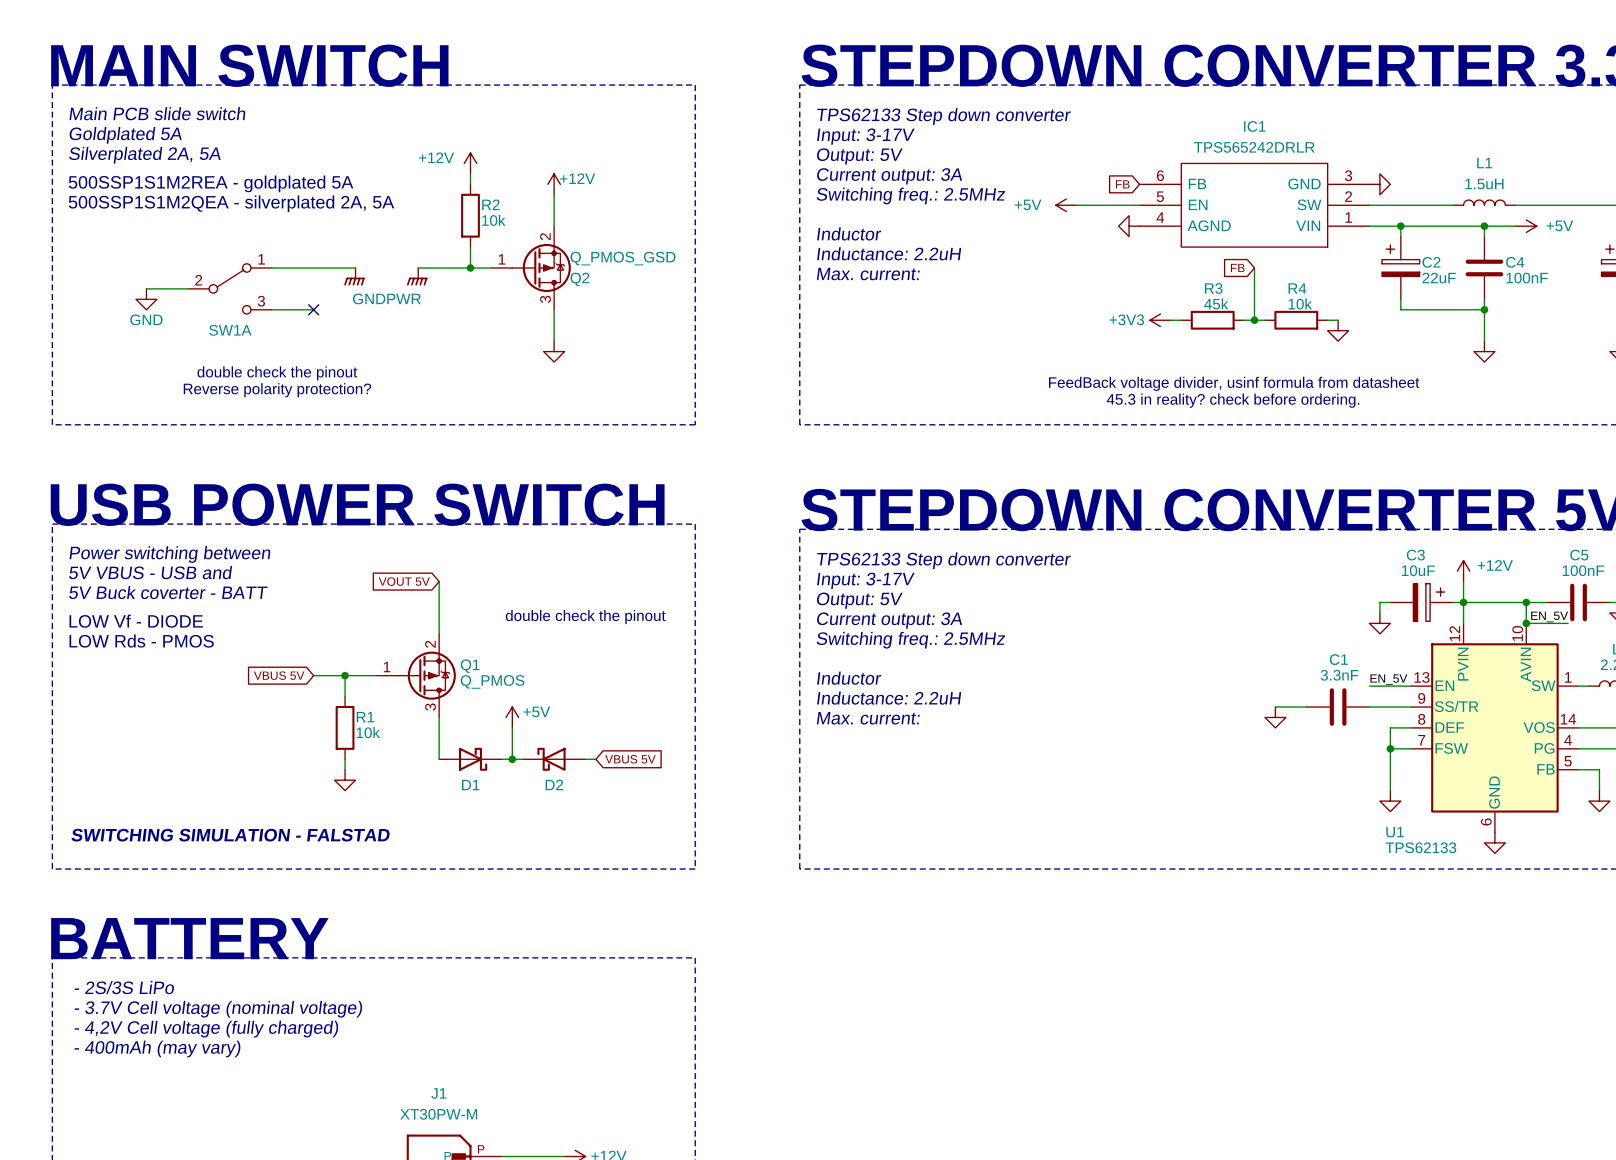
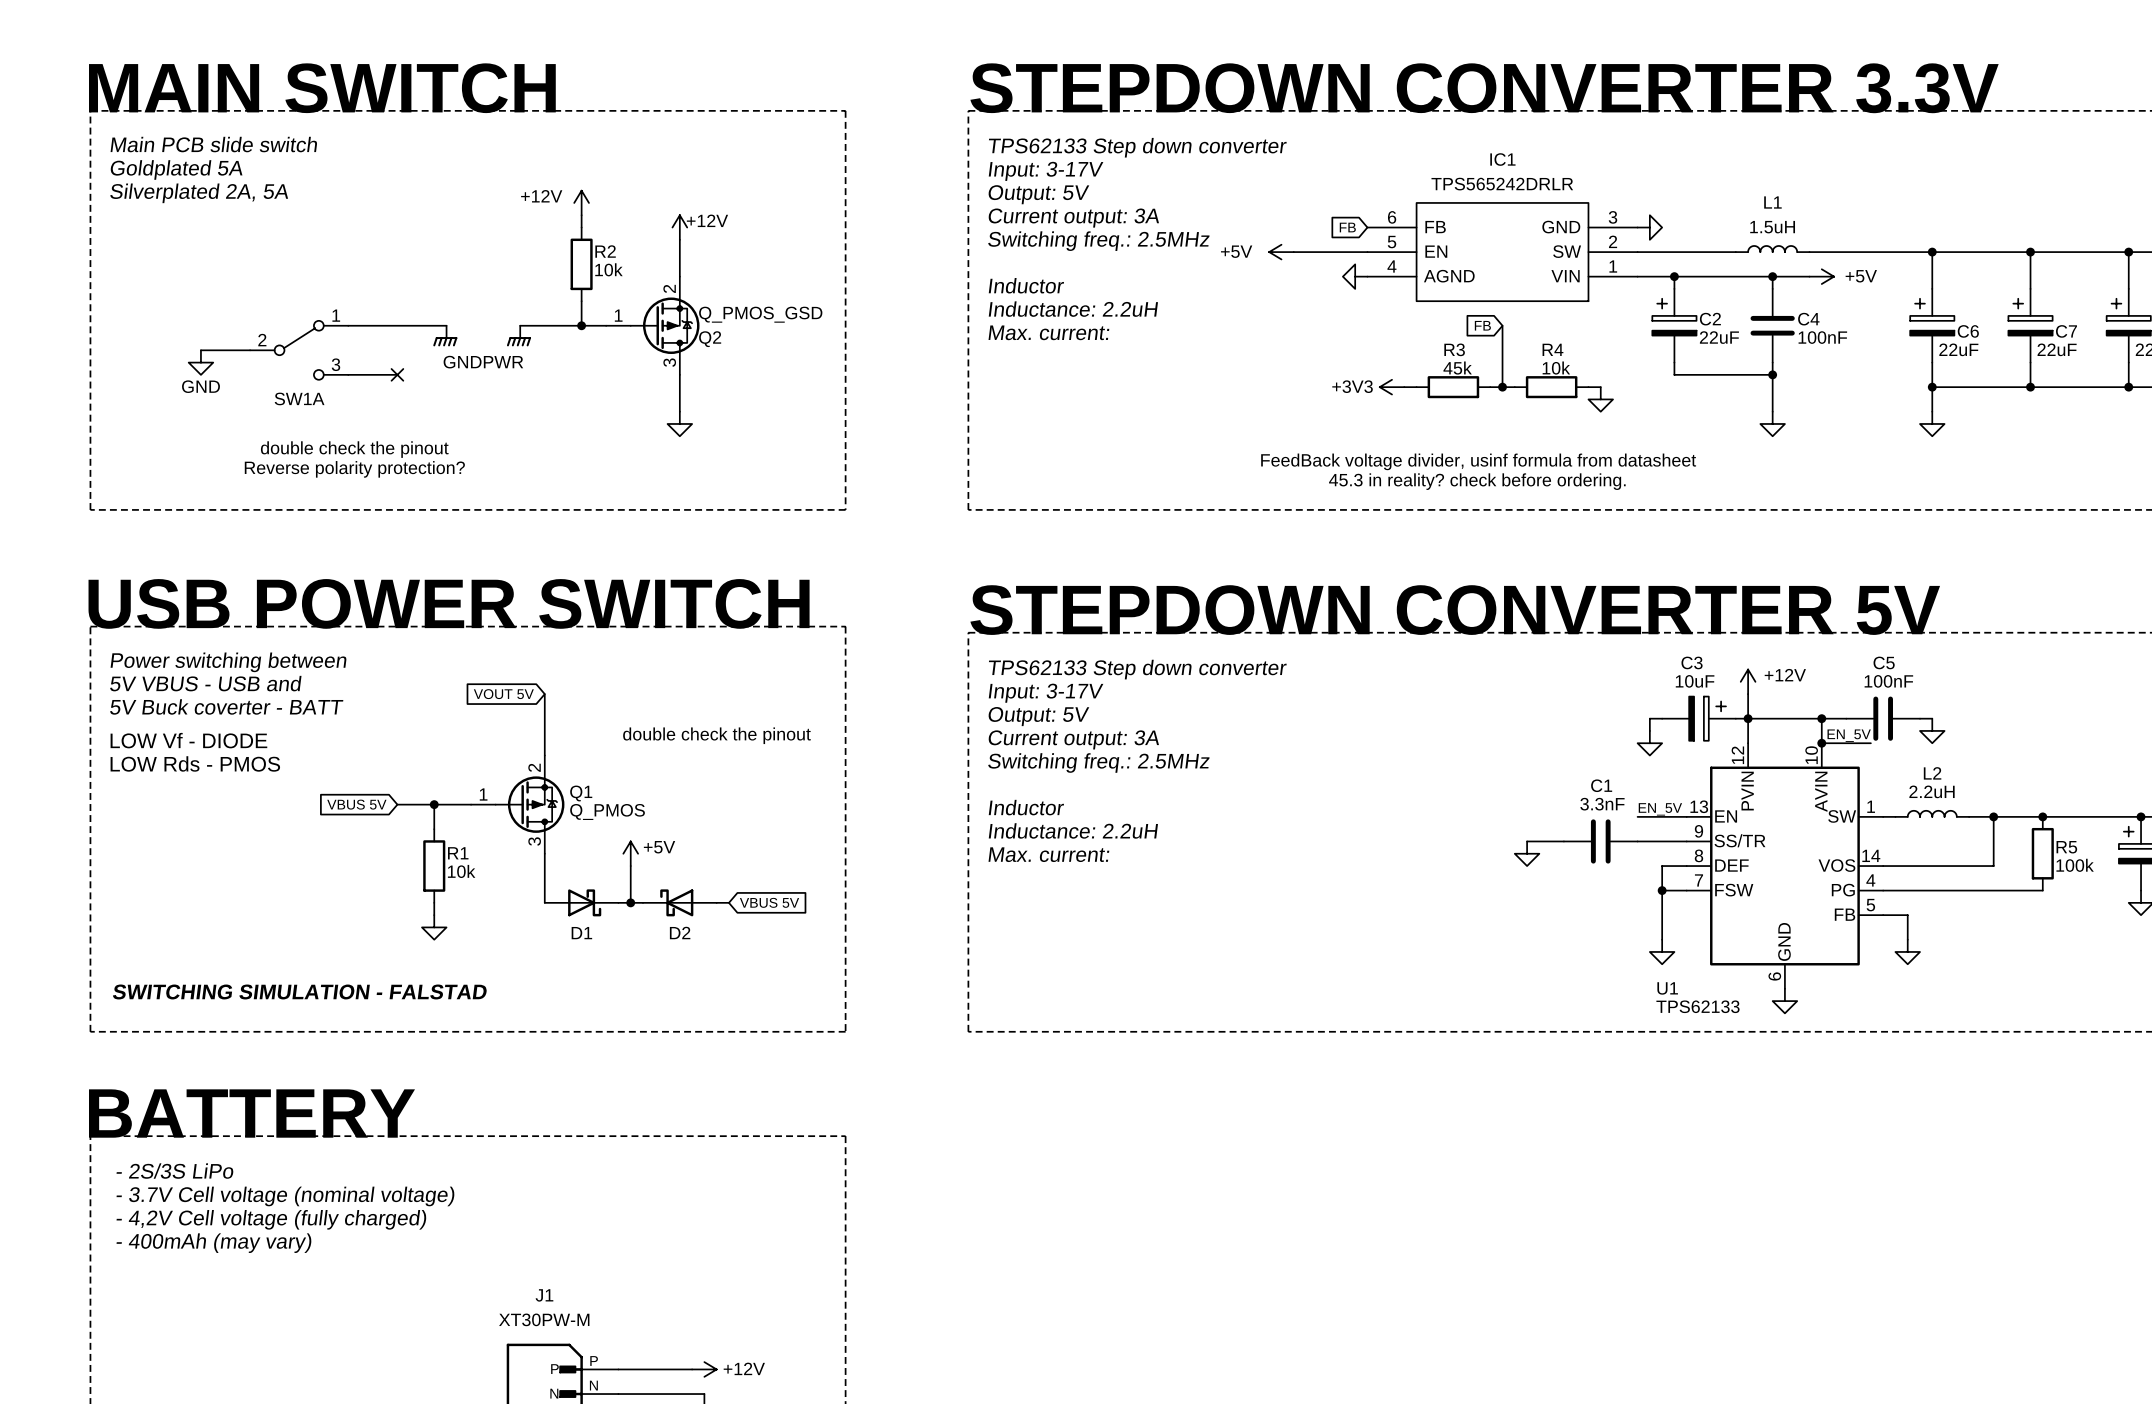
text: 500SSP1S1M2REA - goldplated 5A (211, 183) -> none
text: 500SSP1S1M2QEA - silverplated 2A, 5A (231, 203) -> none

